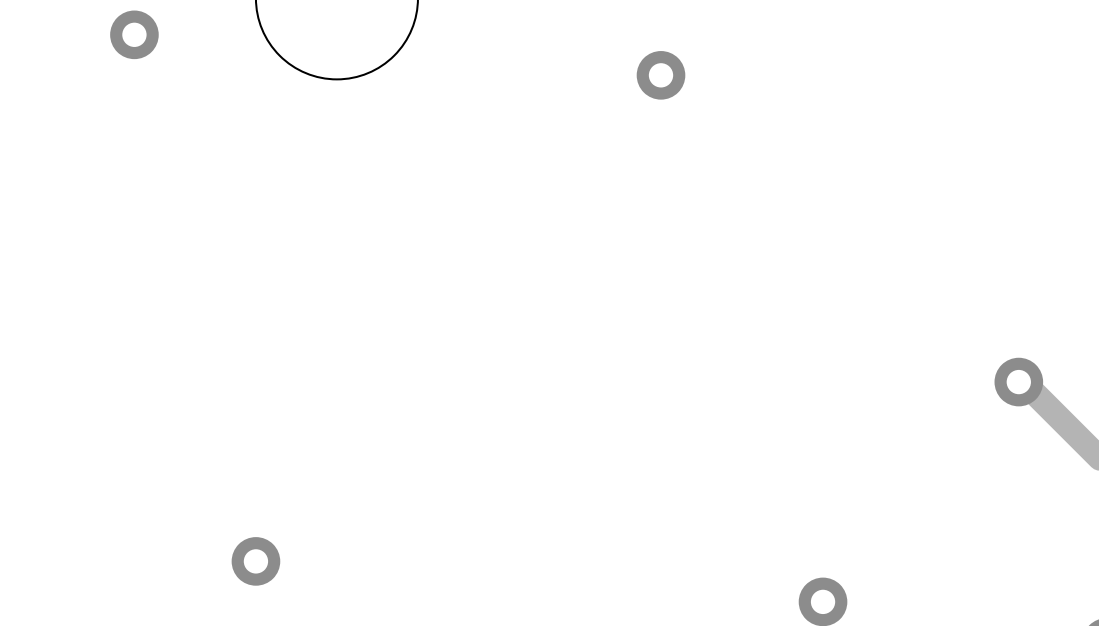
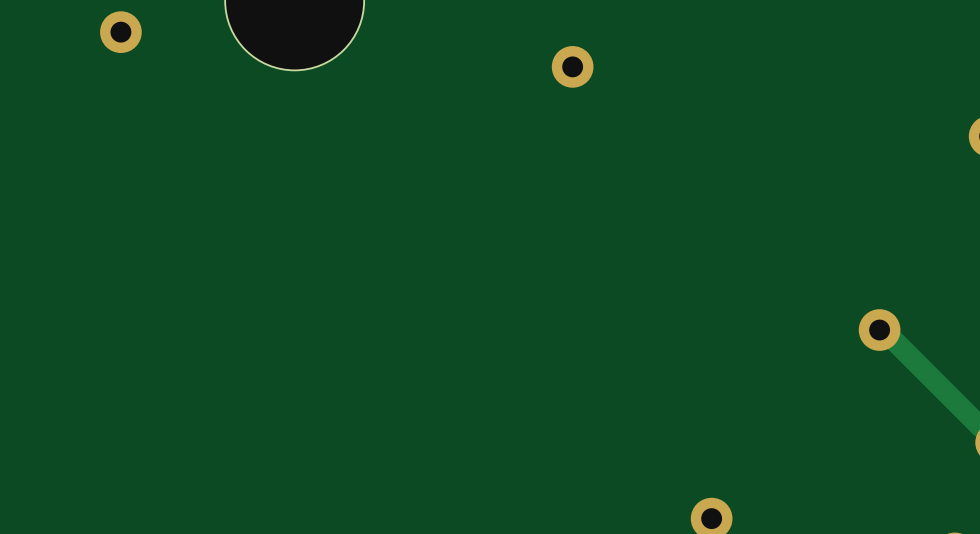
via: (255, 561) -> none

